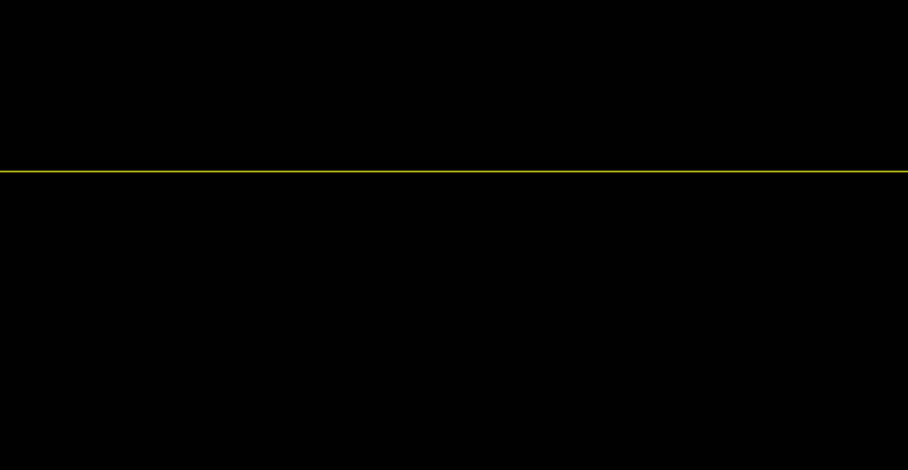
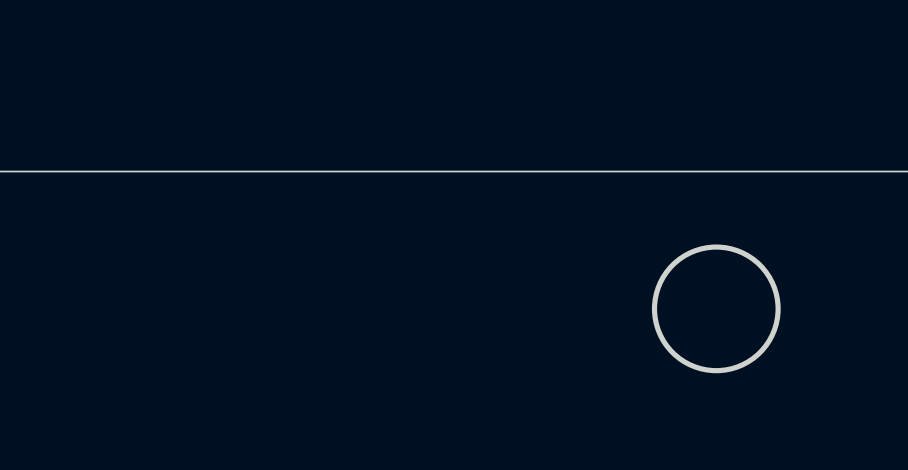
round board edge: none -> [651, 244, 781, 374]

